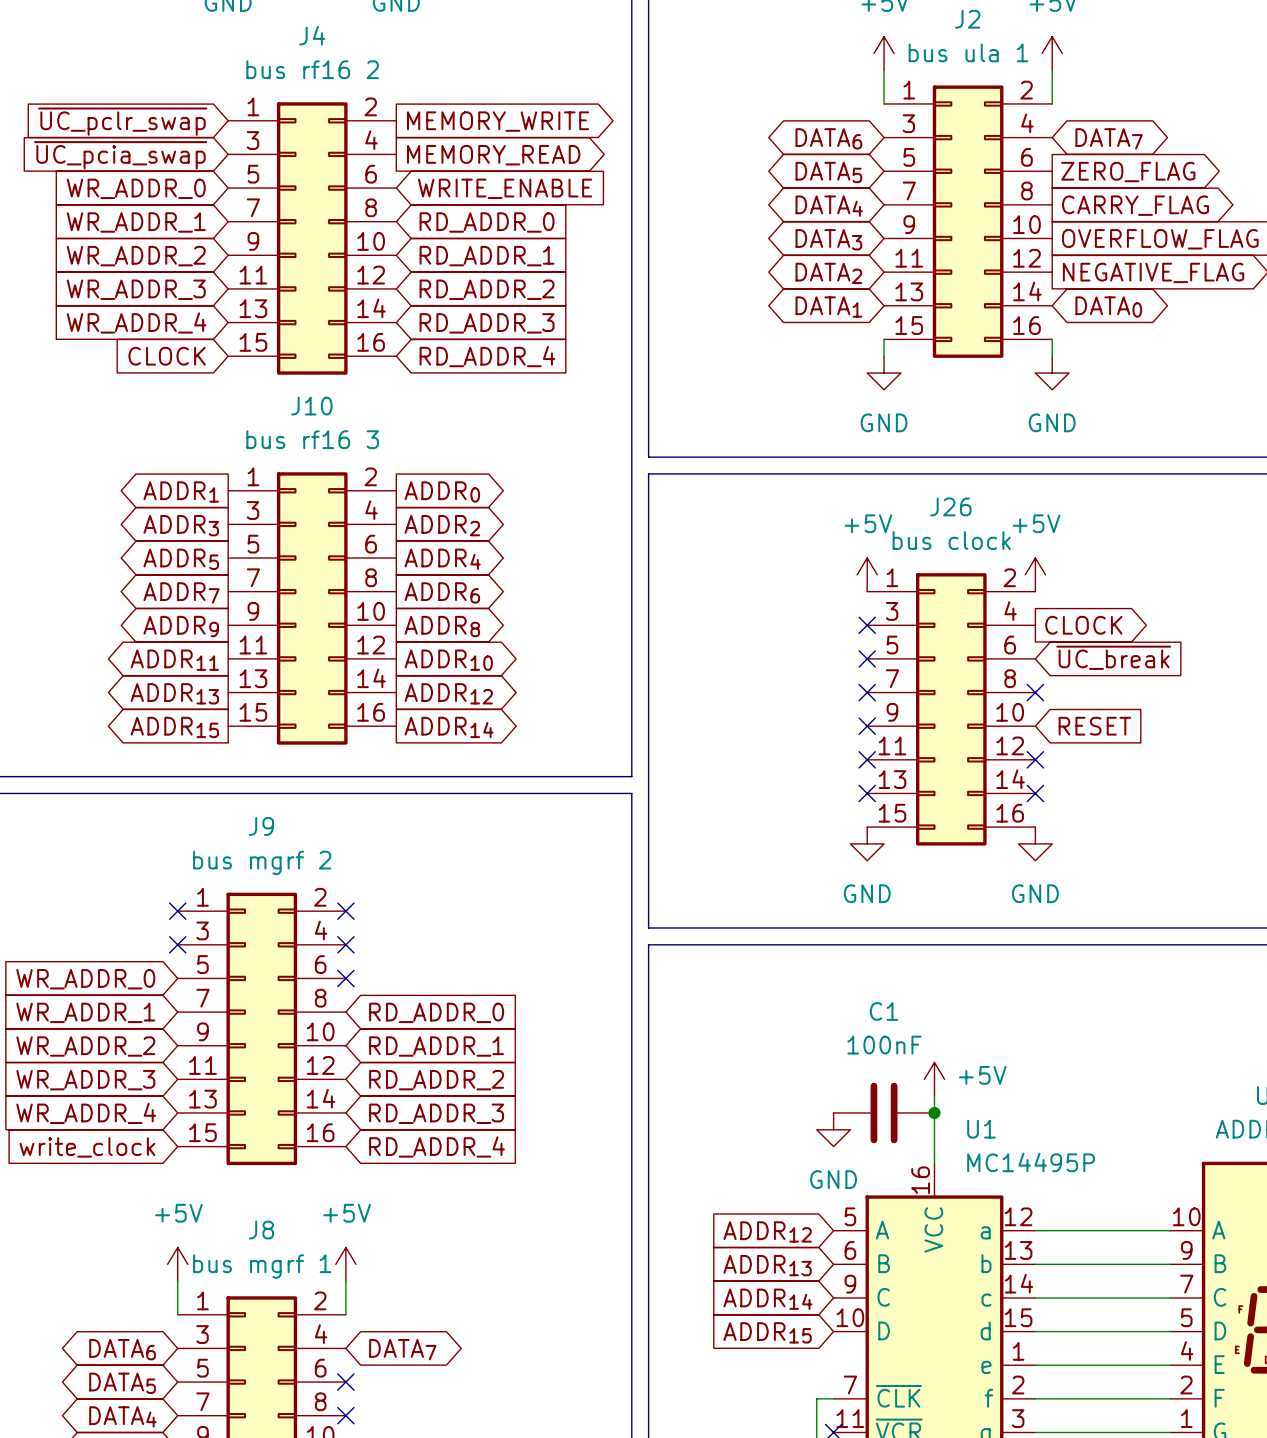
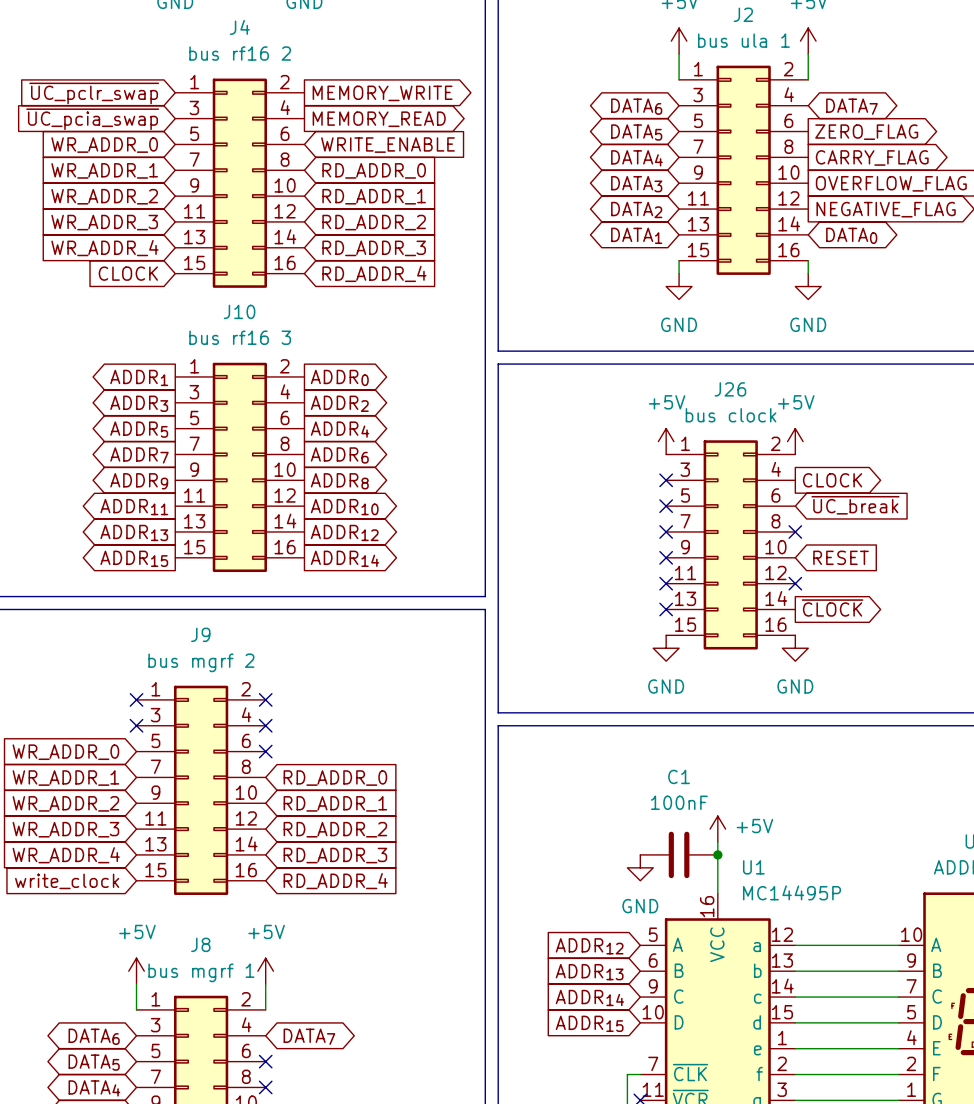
global label: none -> ~{CLOCK} (832, 608)
no-connect mark: (1035, 793) -> none

